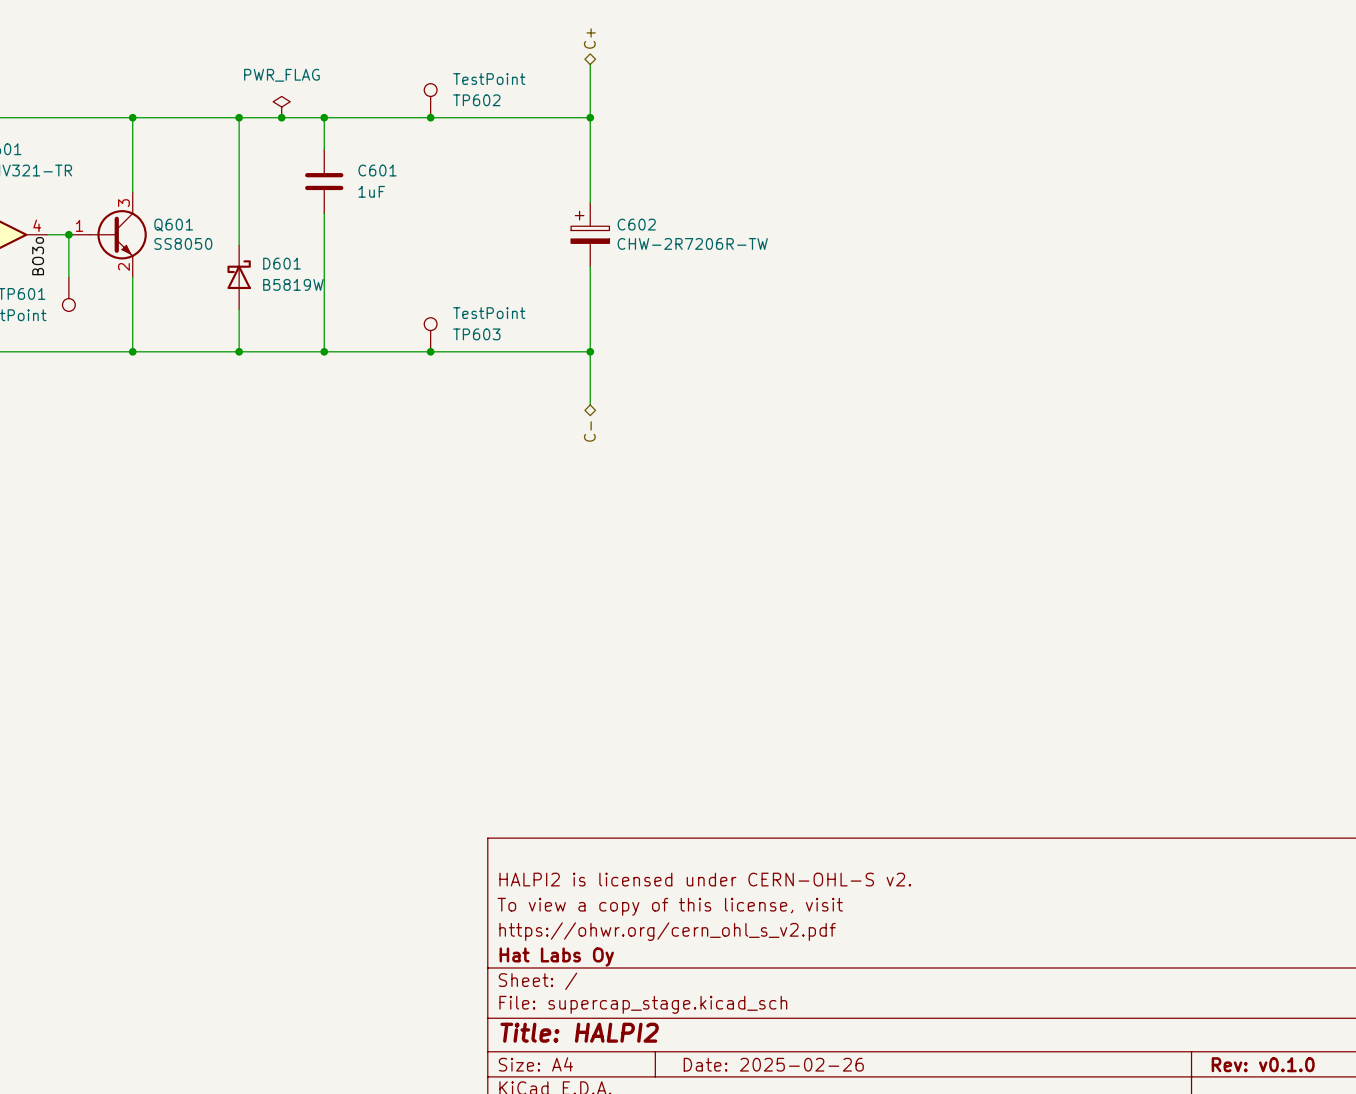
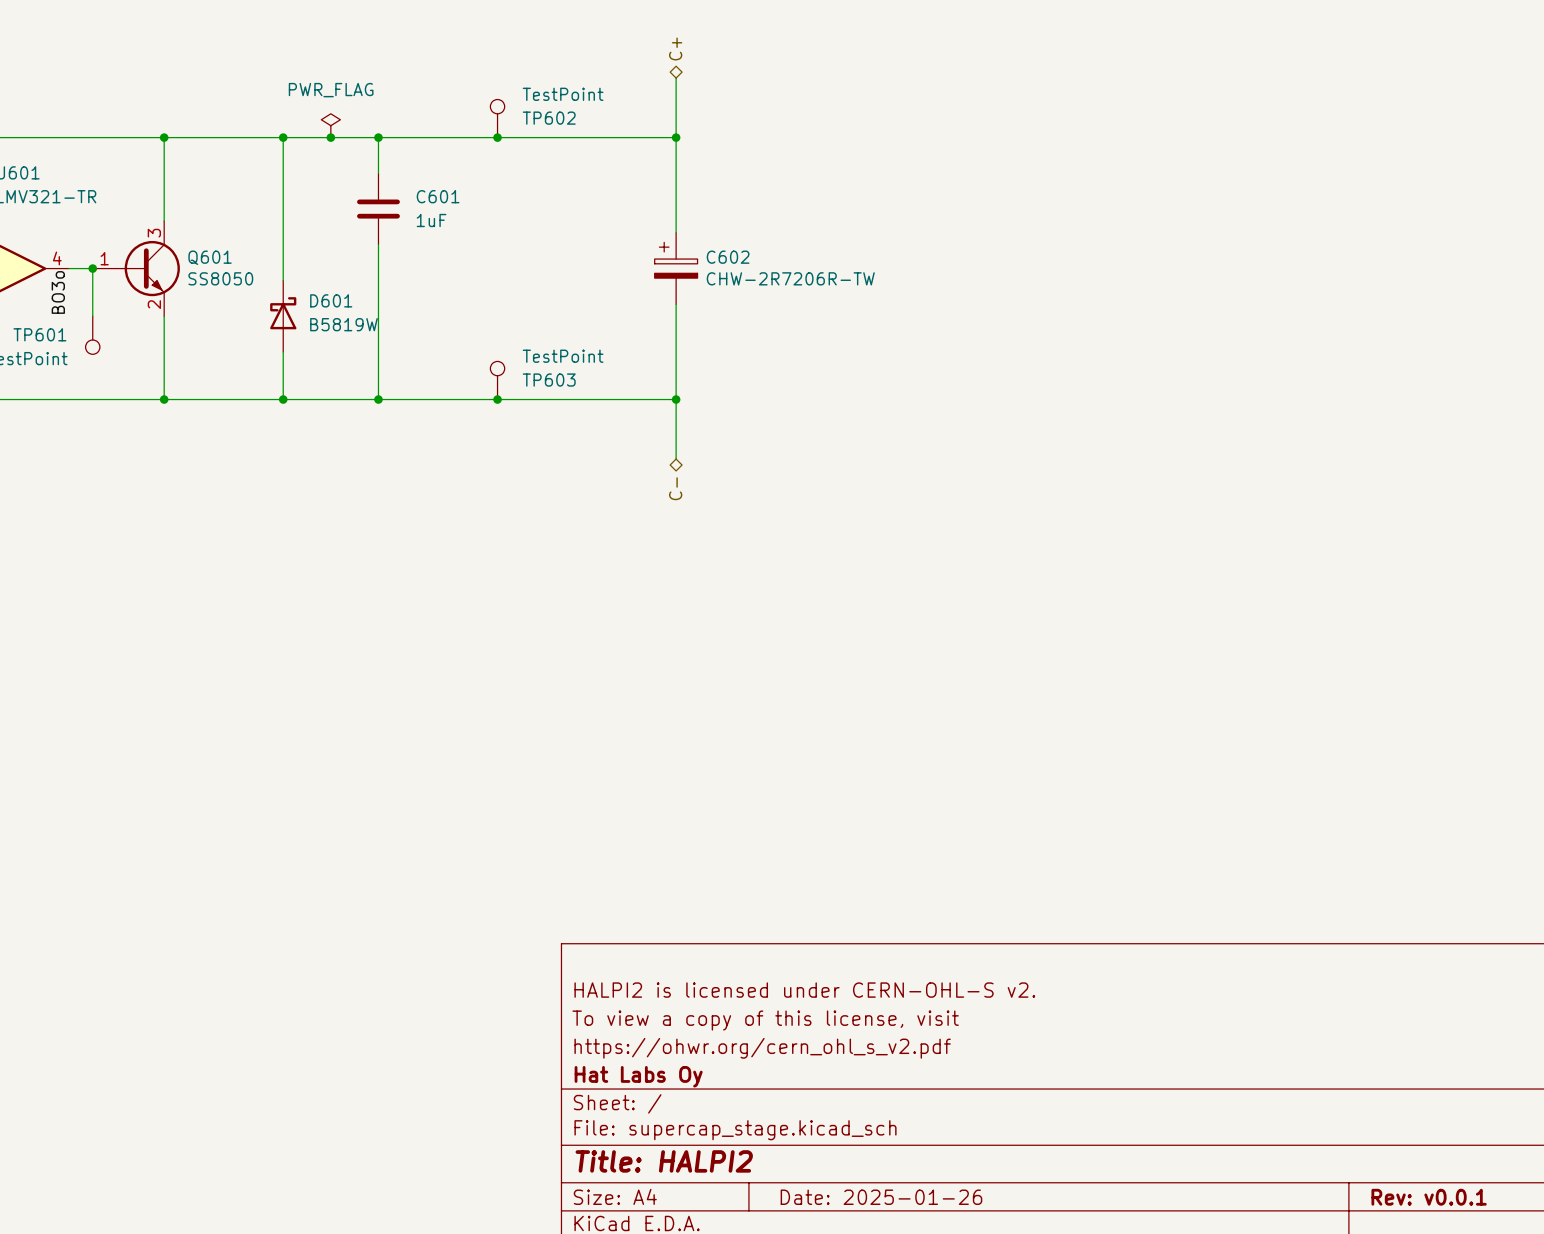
title block: Date: 2025-02-26 (773, 1064) -> Date: 2025-01-26 (881, 1197)
title block: Rev: v0.1.0 (1263, 1064) -> Rev: v0.0.1 (1429, 1197)

